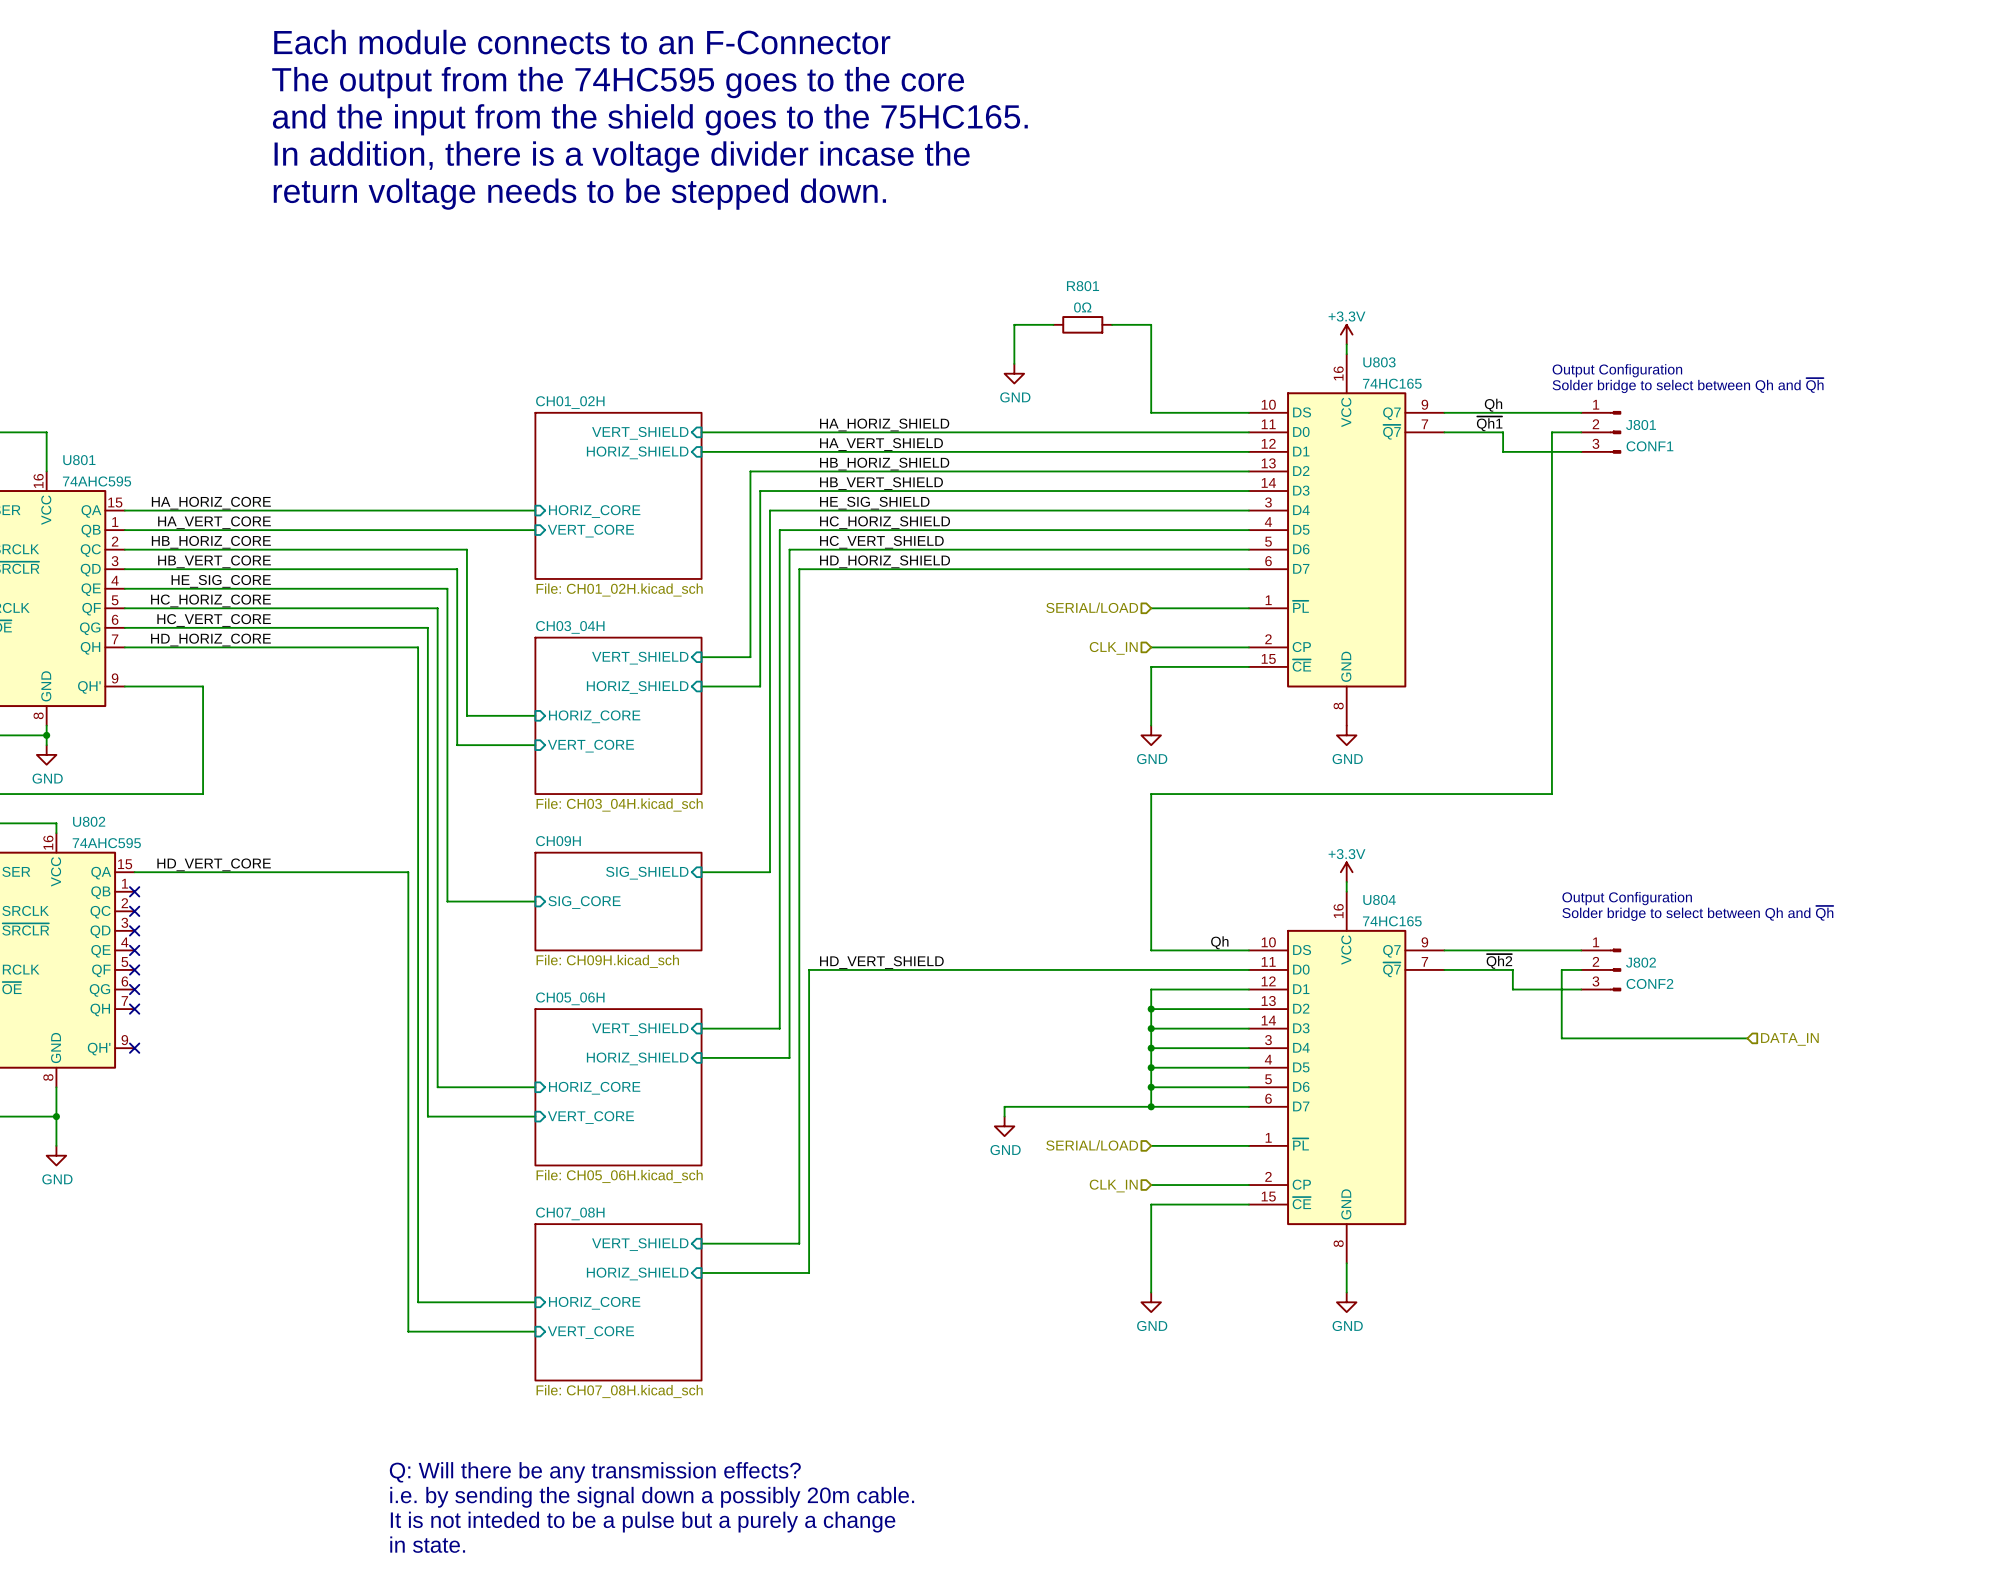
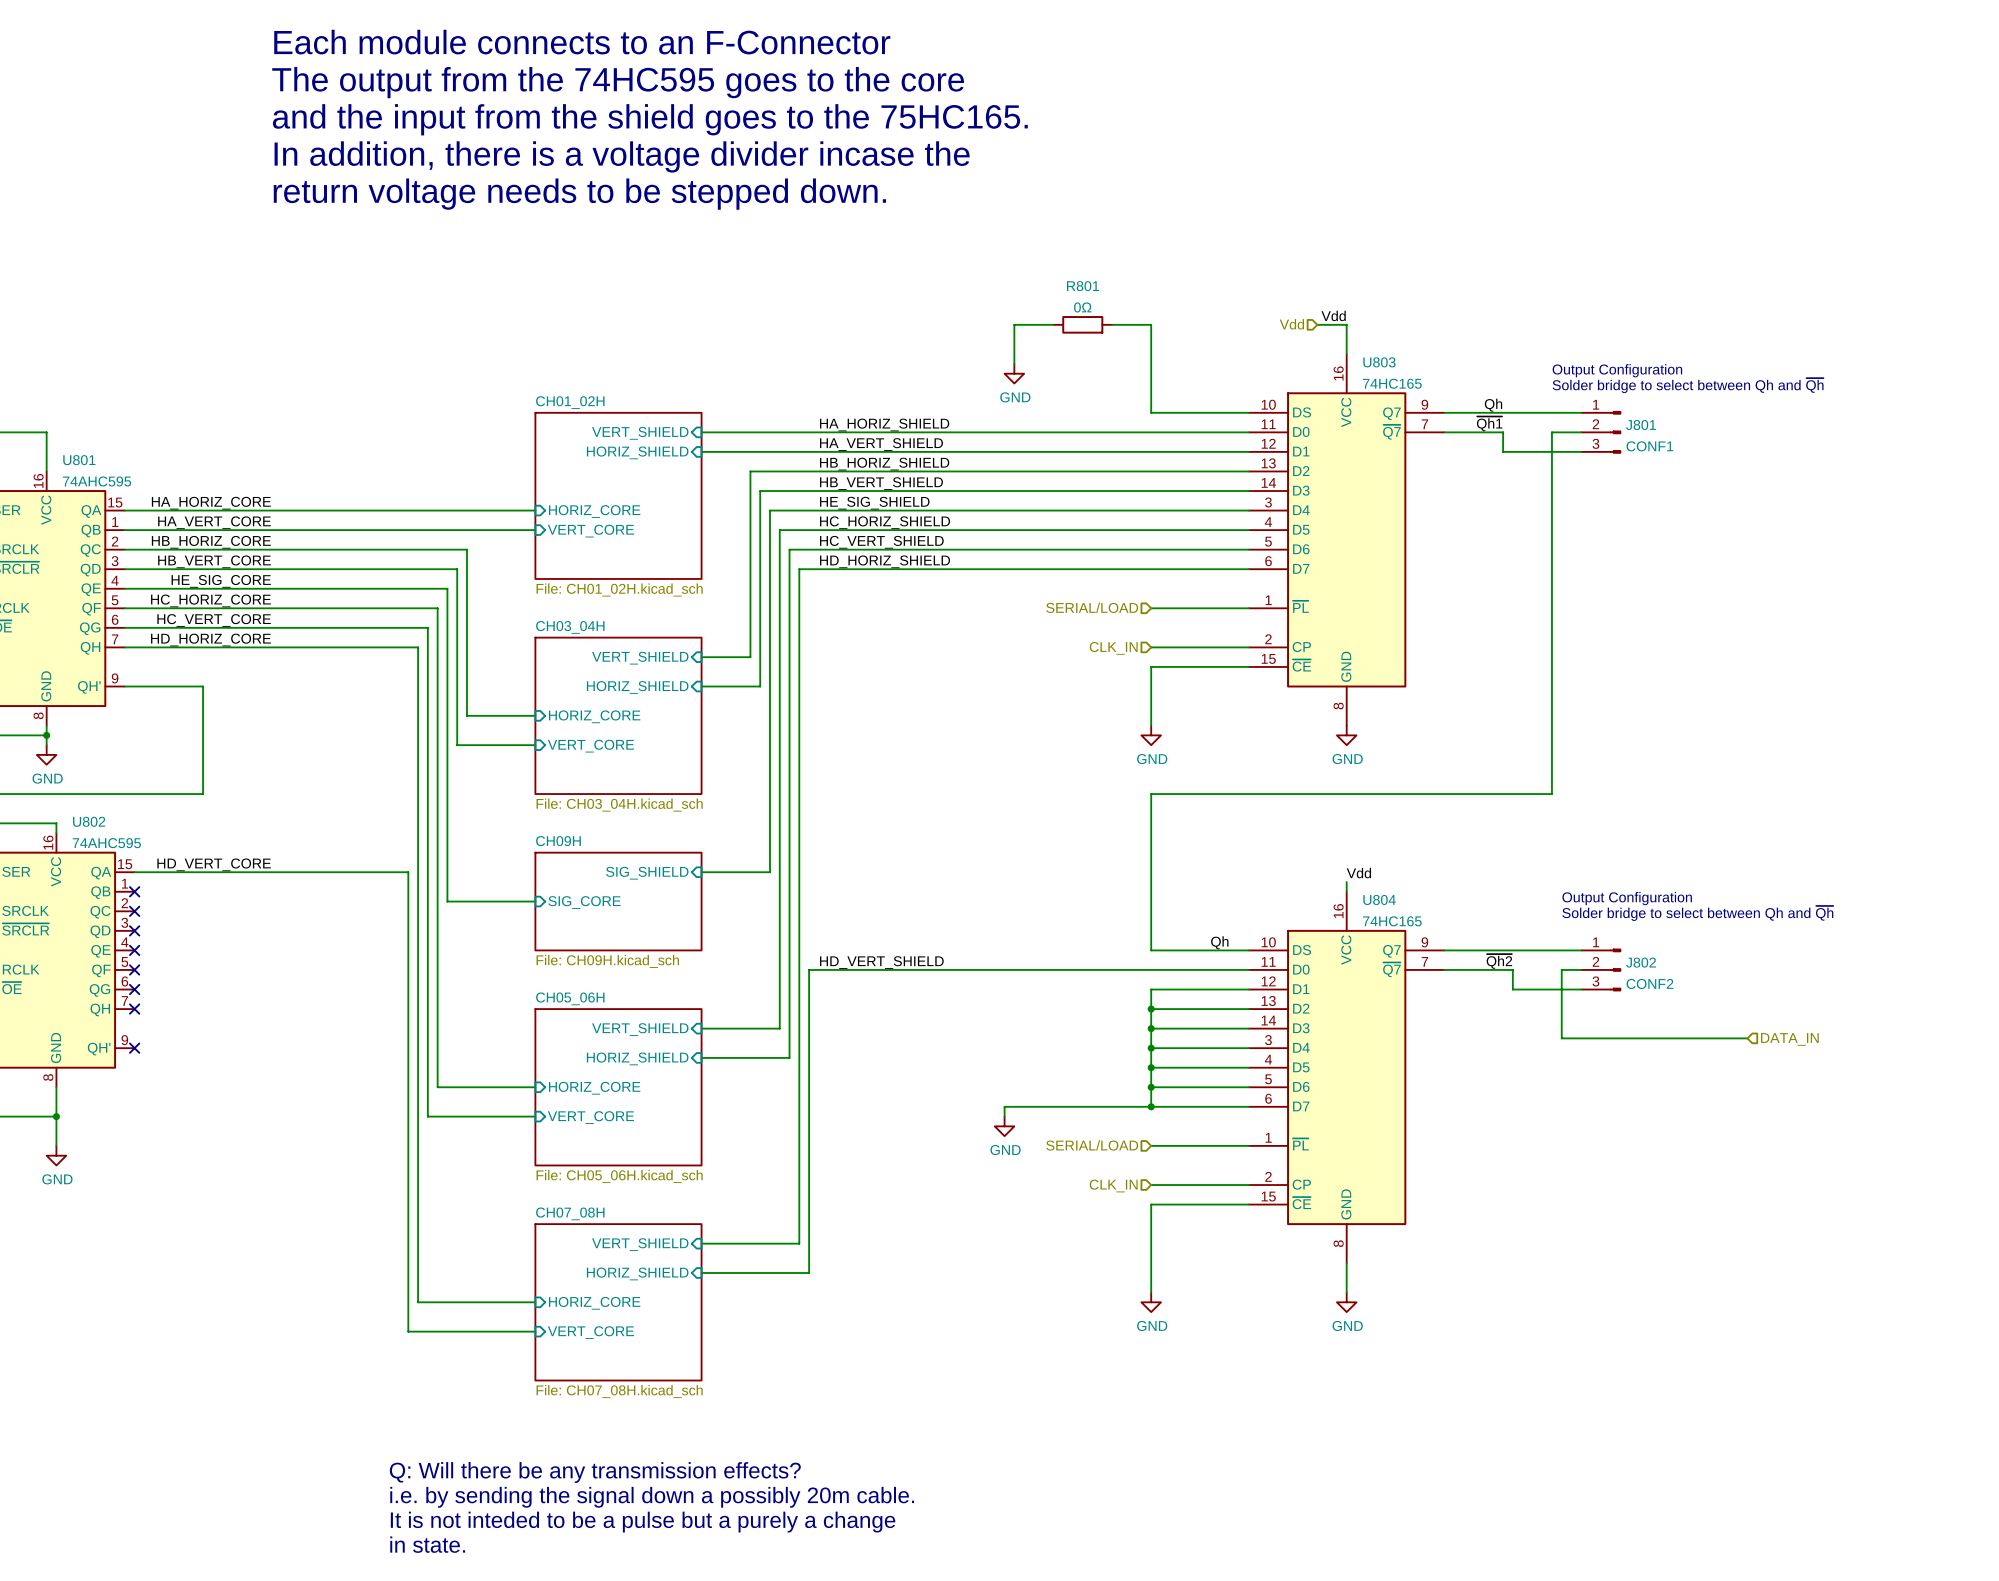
label: none -> Vdd (1333, 315)
hierarchical label: none -> Vdd (1291, 324)
wire: none -> (1317, 324) (1346, 324) (1346, 344)
power symbol: +3.3V (1346, 334) -> none
power symbol: +3.3V (1346, 872) -> none
label: none -> Vdd (1358, 873)

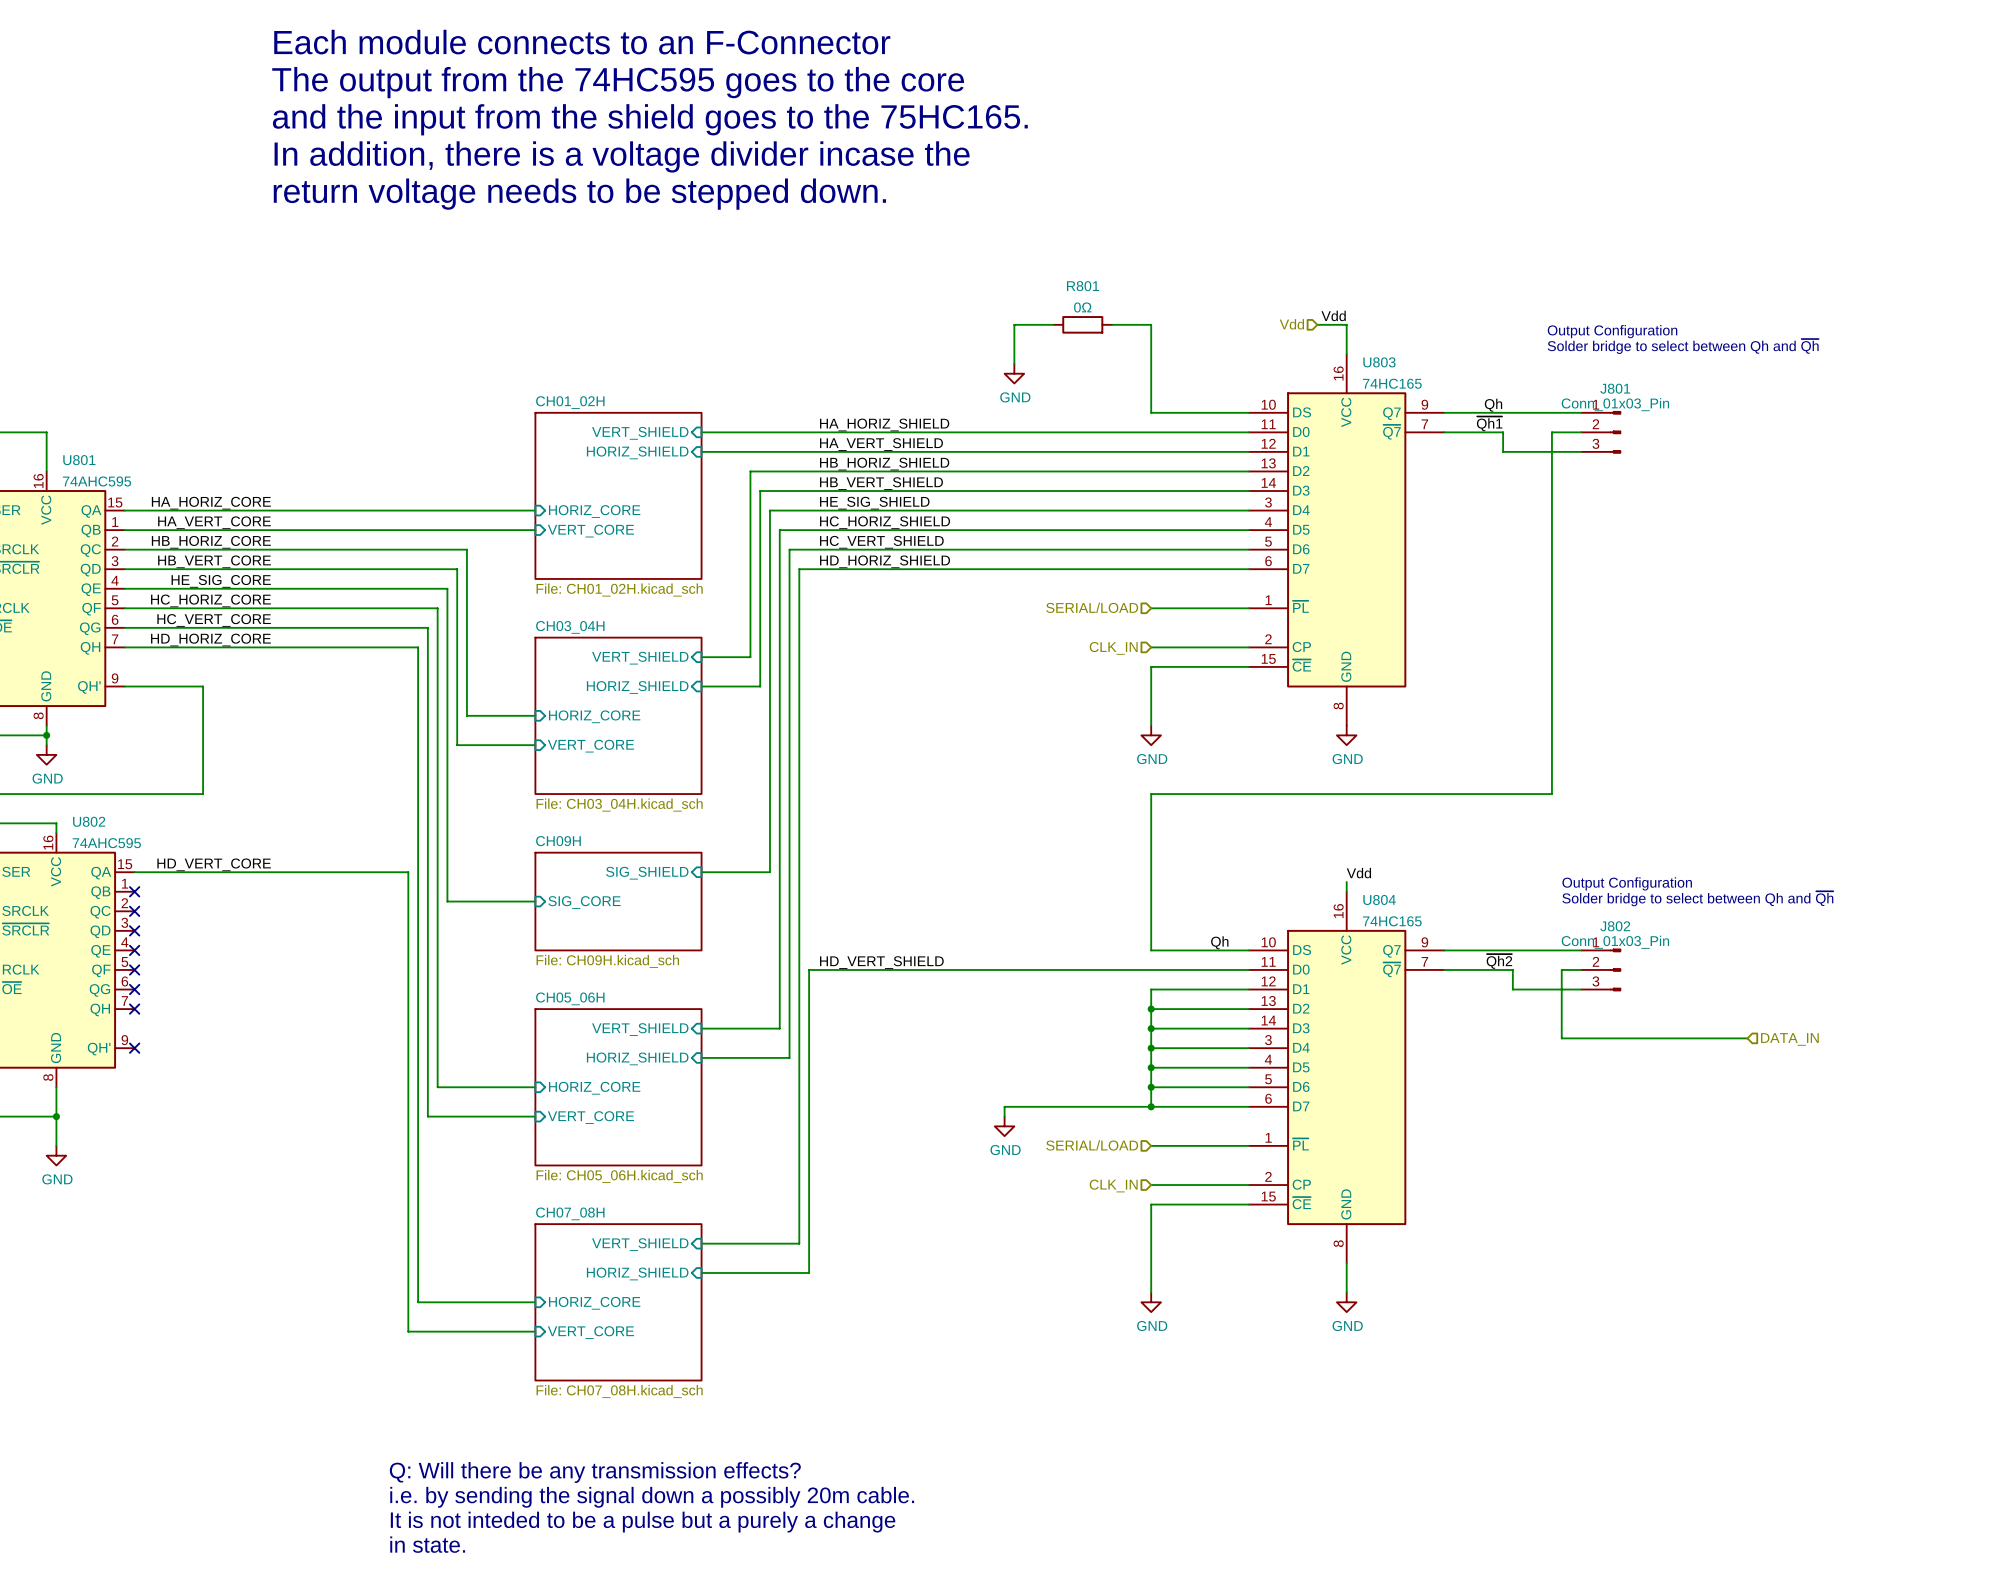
text position: Output Configuration (1617, 370) -> Output Configuration (1612, 331)
text position: Solder bridge to select between Qh and ~{Qh} (1688, 385) -> Solder bridge to select between Qh and ~{Qh} (1683, 346)
J801 name position: J801 (1641, 425) -> J801 (1615, 388)
J801 value: CONF1 (1649, 446) -> Conn_01x03_Pin (1615, 404)
text: none -> Output Configuration (1627, 883)
text: Output Configuration (1627, 898) -> Solder bridge to select between Qh and ~{Qh} (1697, 898)
text: Solder bridge to select between Qh and ~{Qh} (1697, 913) -> none
J802 name position: J802 (1641, 962) -> J802 (1615, 926)
J802 value: CONF2 (1649, 983) -> Conn_01x03_Pin (1615, 942)

